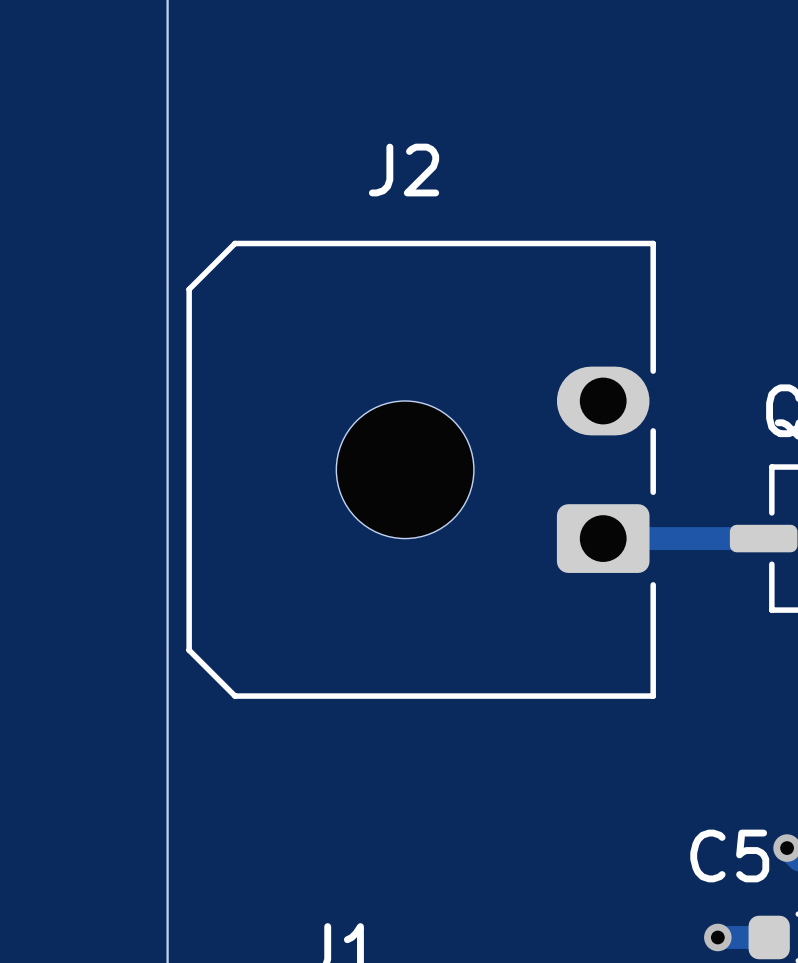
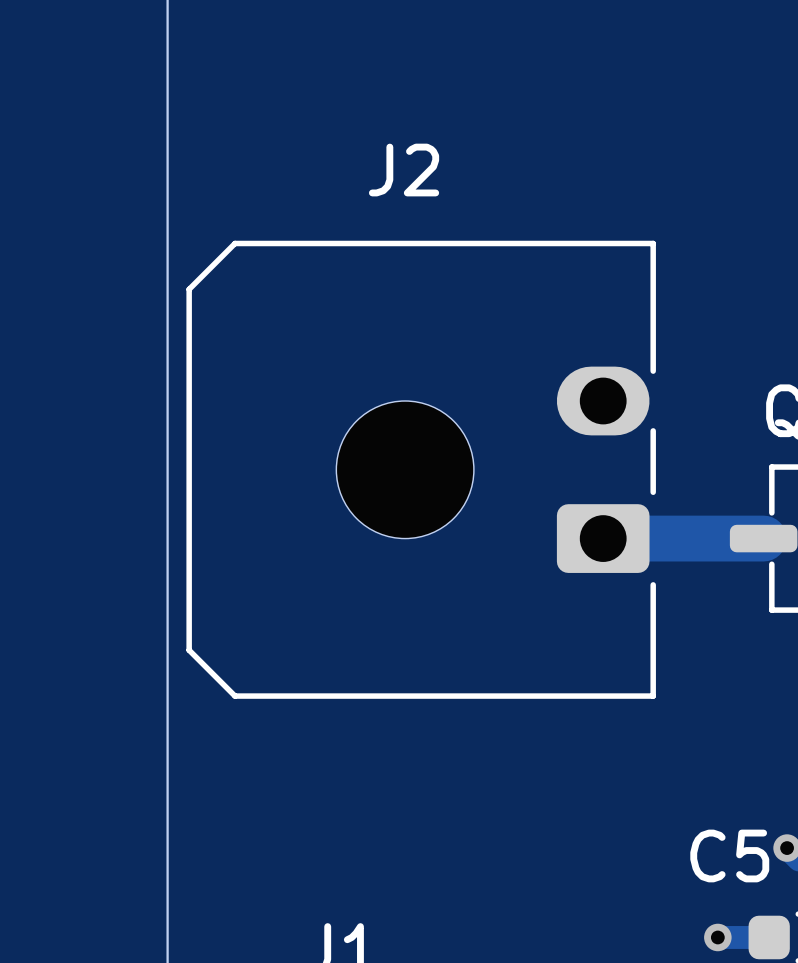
track width: thin (603, 538) (763, 538) -> thick (603, 538) (763, 538)

